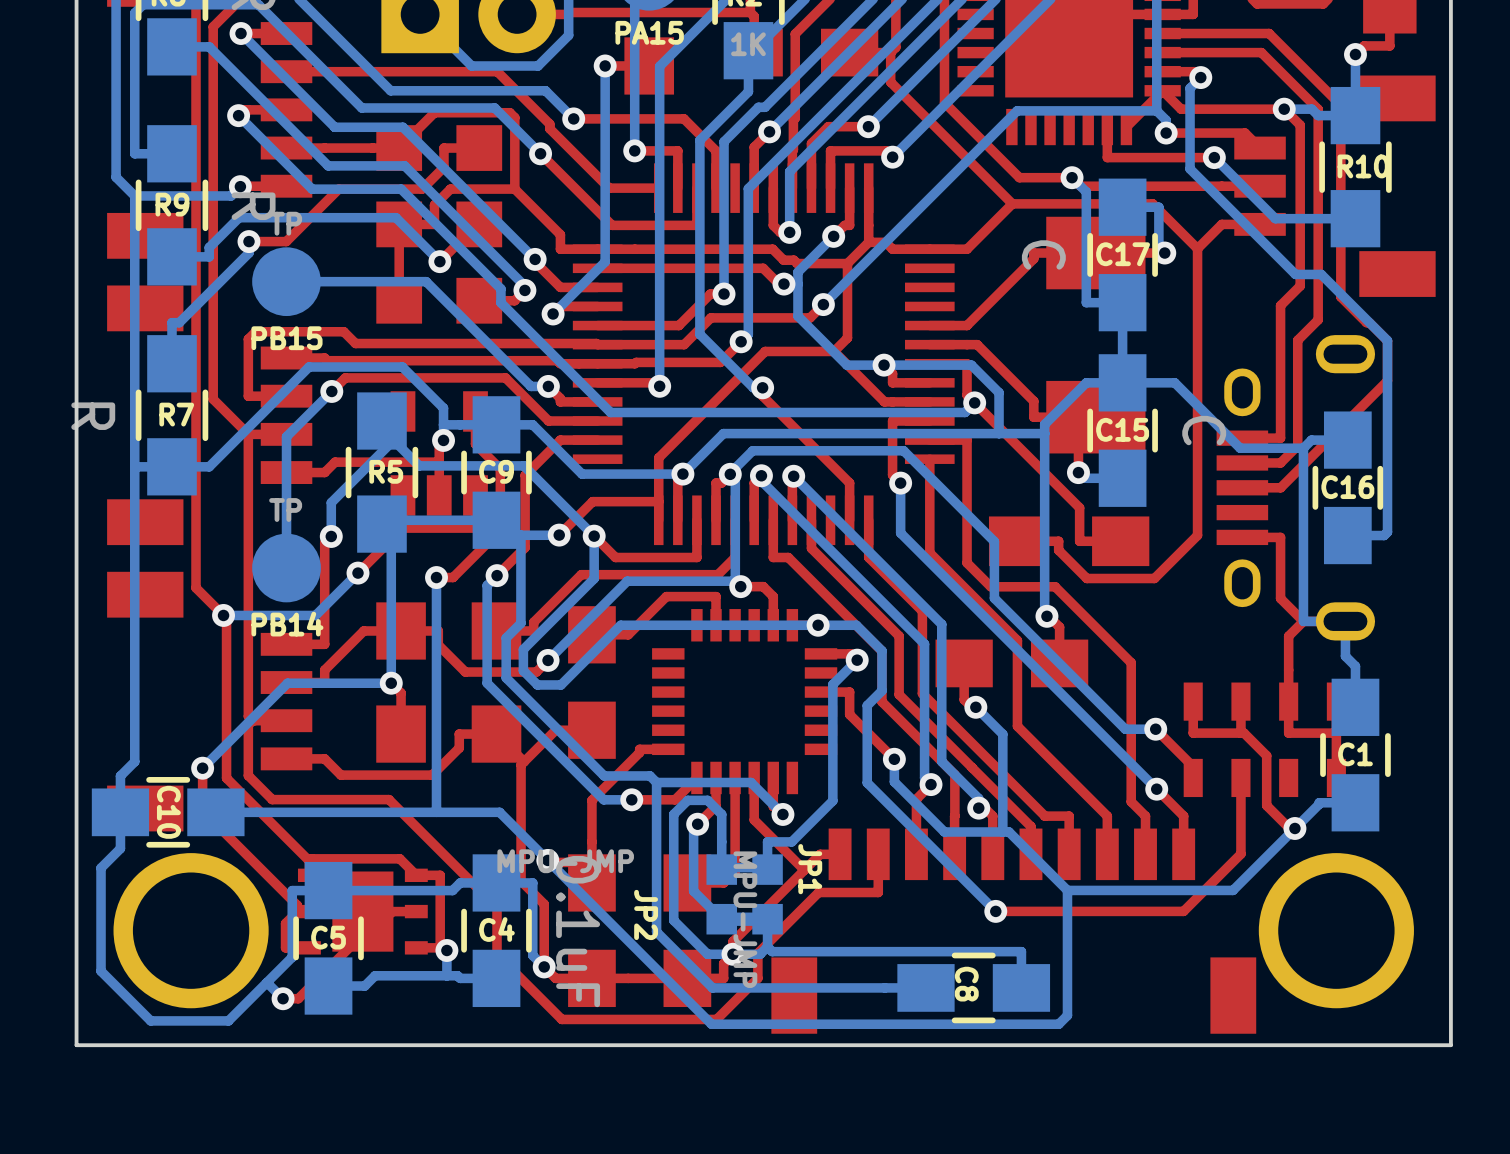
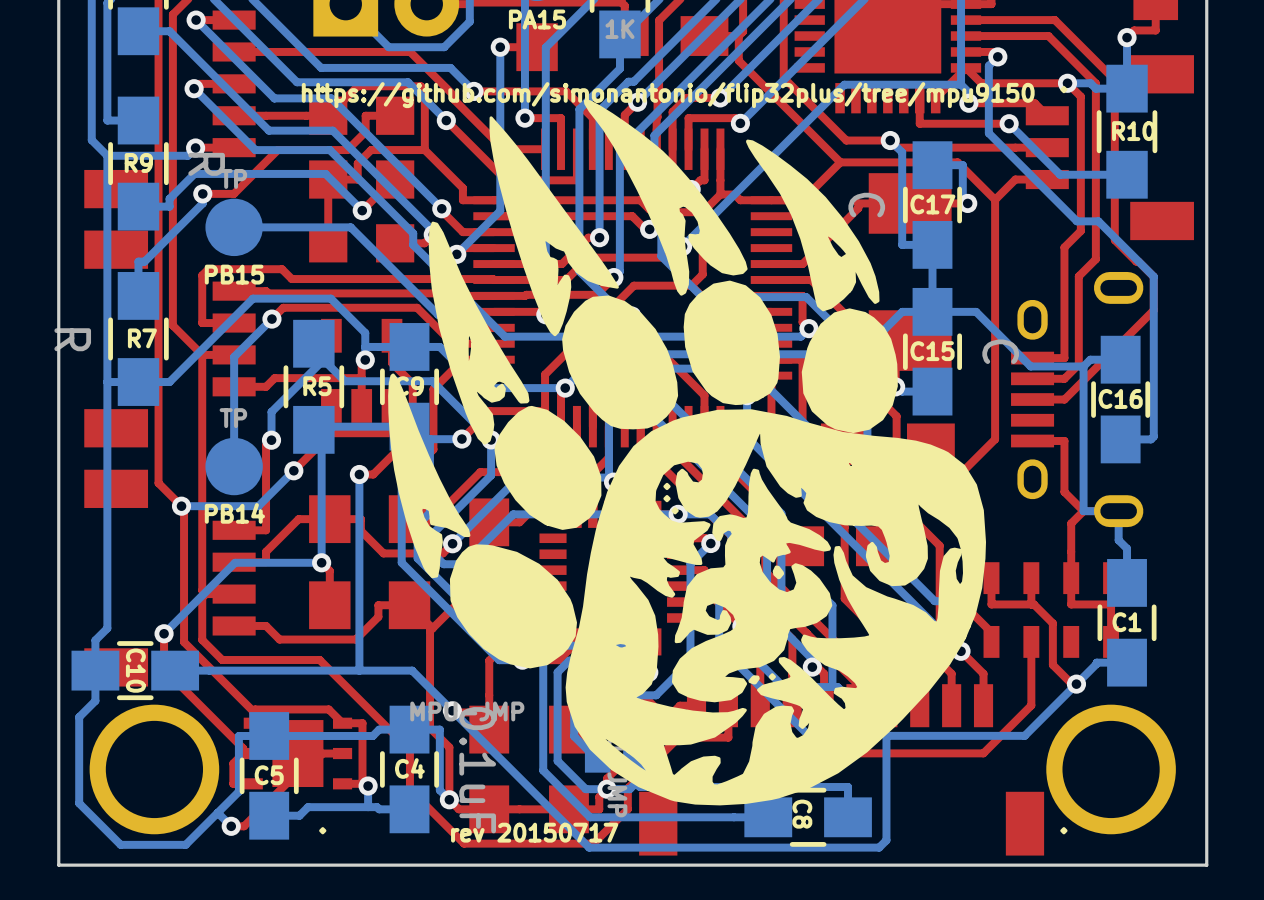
drawing: none -> [319, 85, 1068, 835]
text: none -> https://github.com/simonantonio/flip32plus/tree/mpu9150 (668, 95)
JP1 name: JP1 (810, 869) -> none
JP2 name: JP2 (646, 914) -> none
text: none -> rev 20150717 (534, 832)

